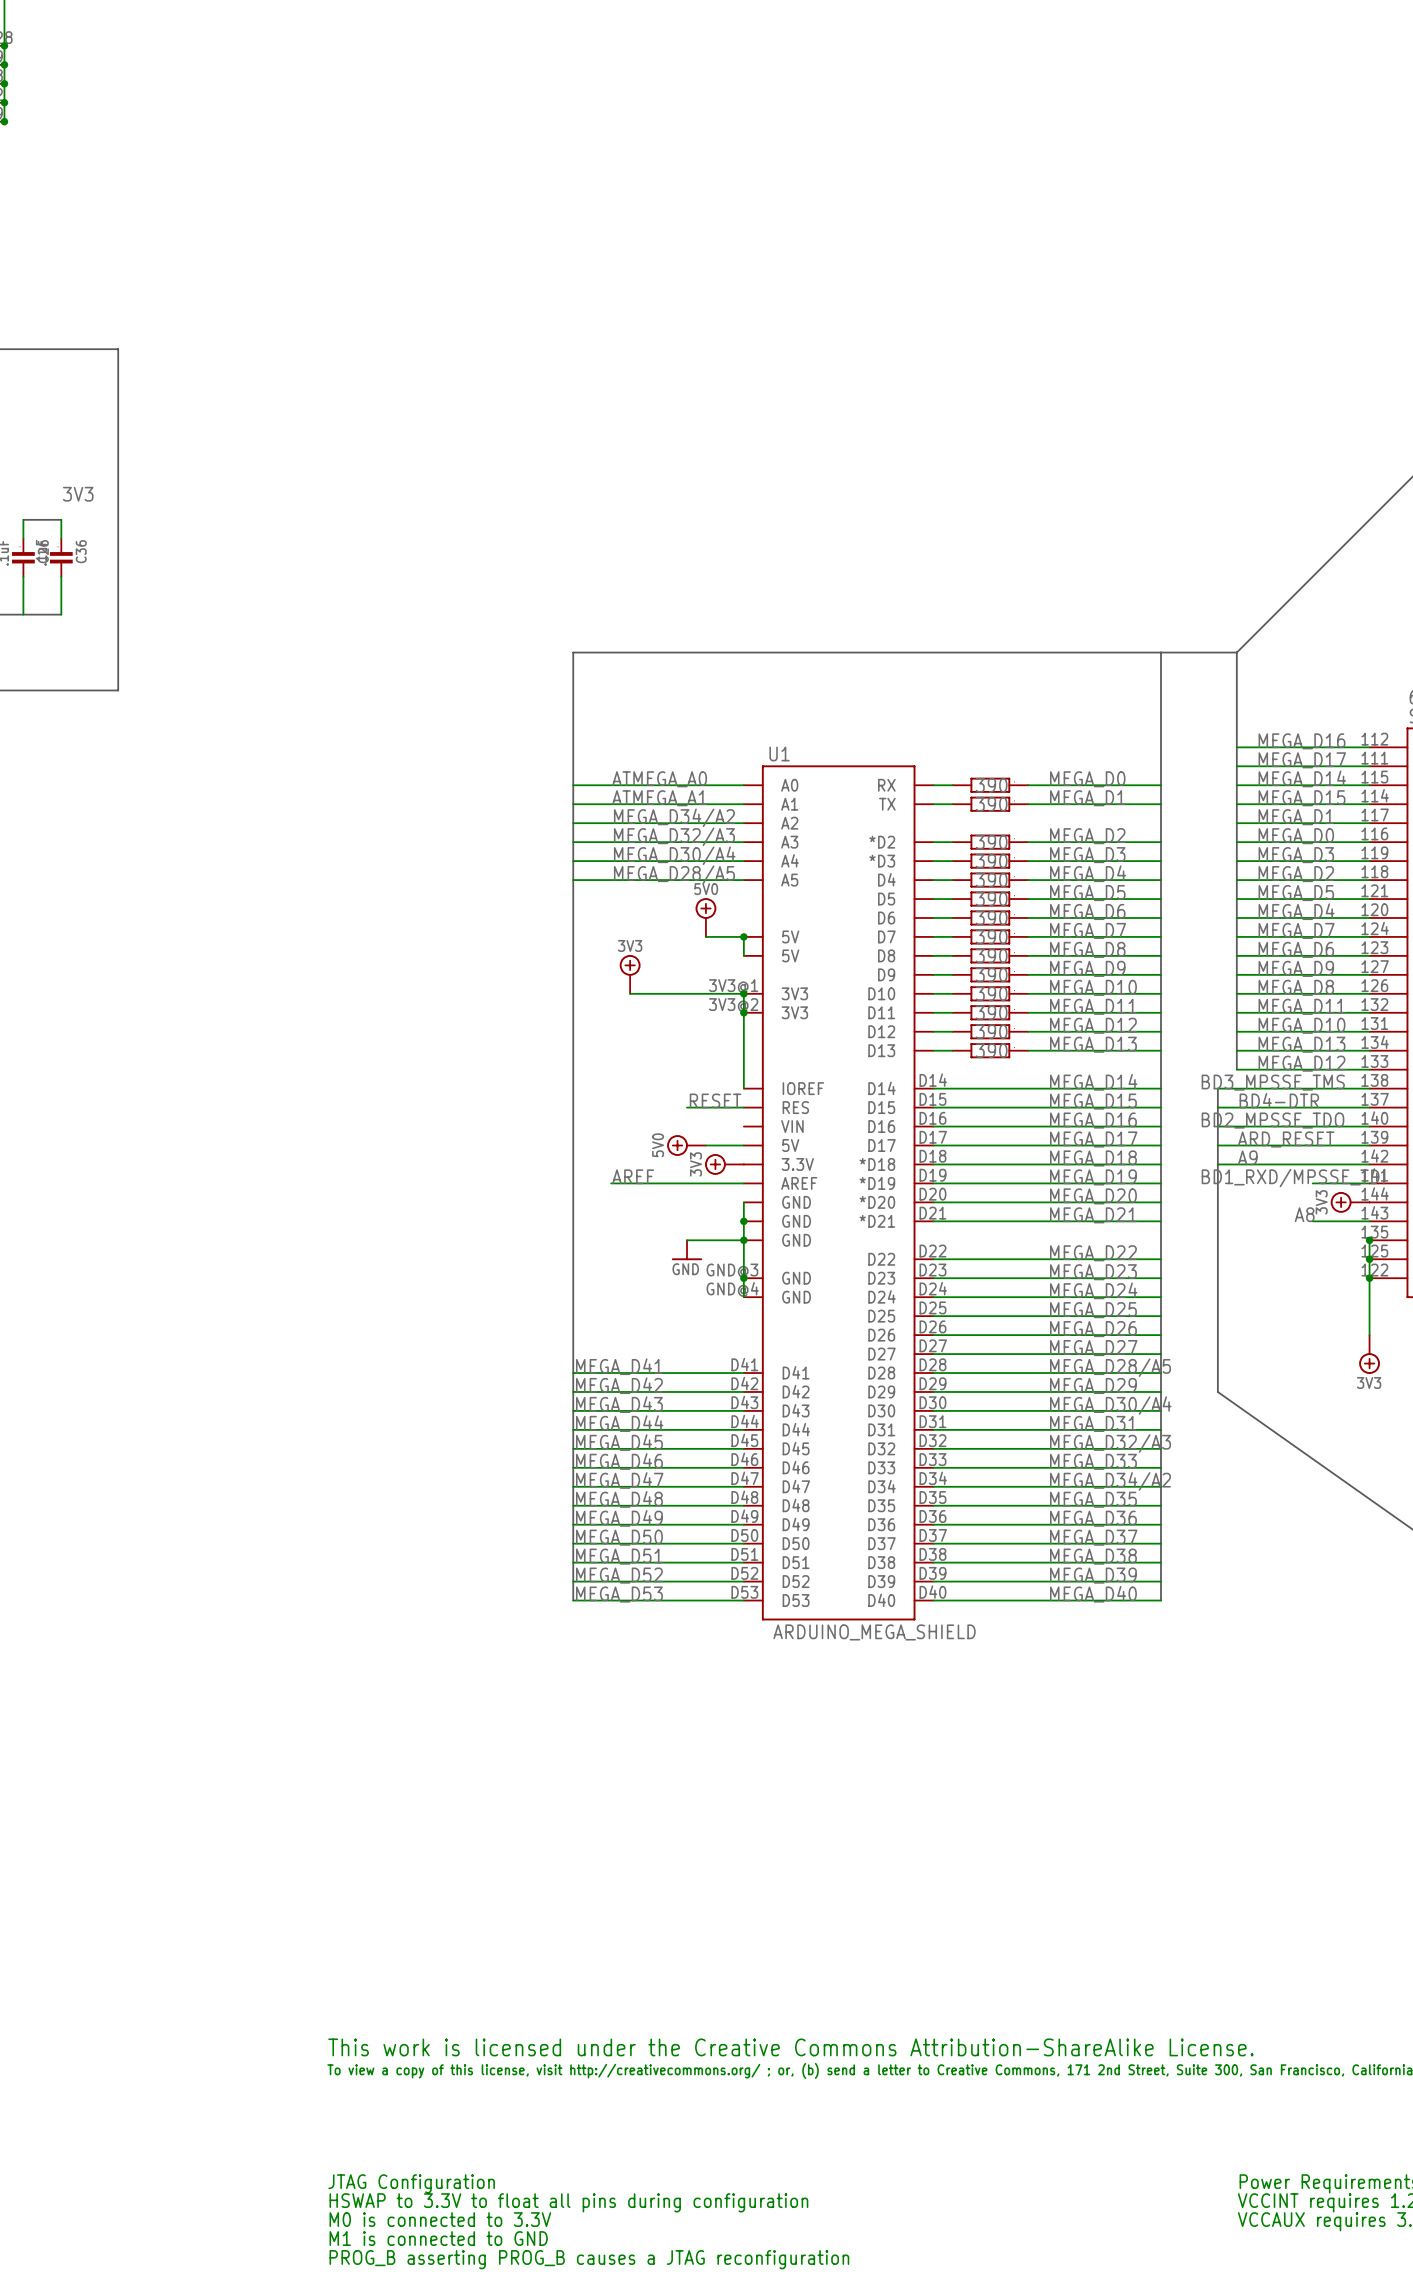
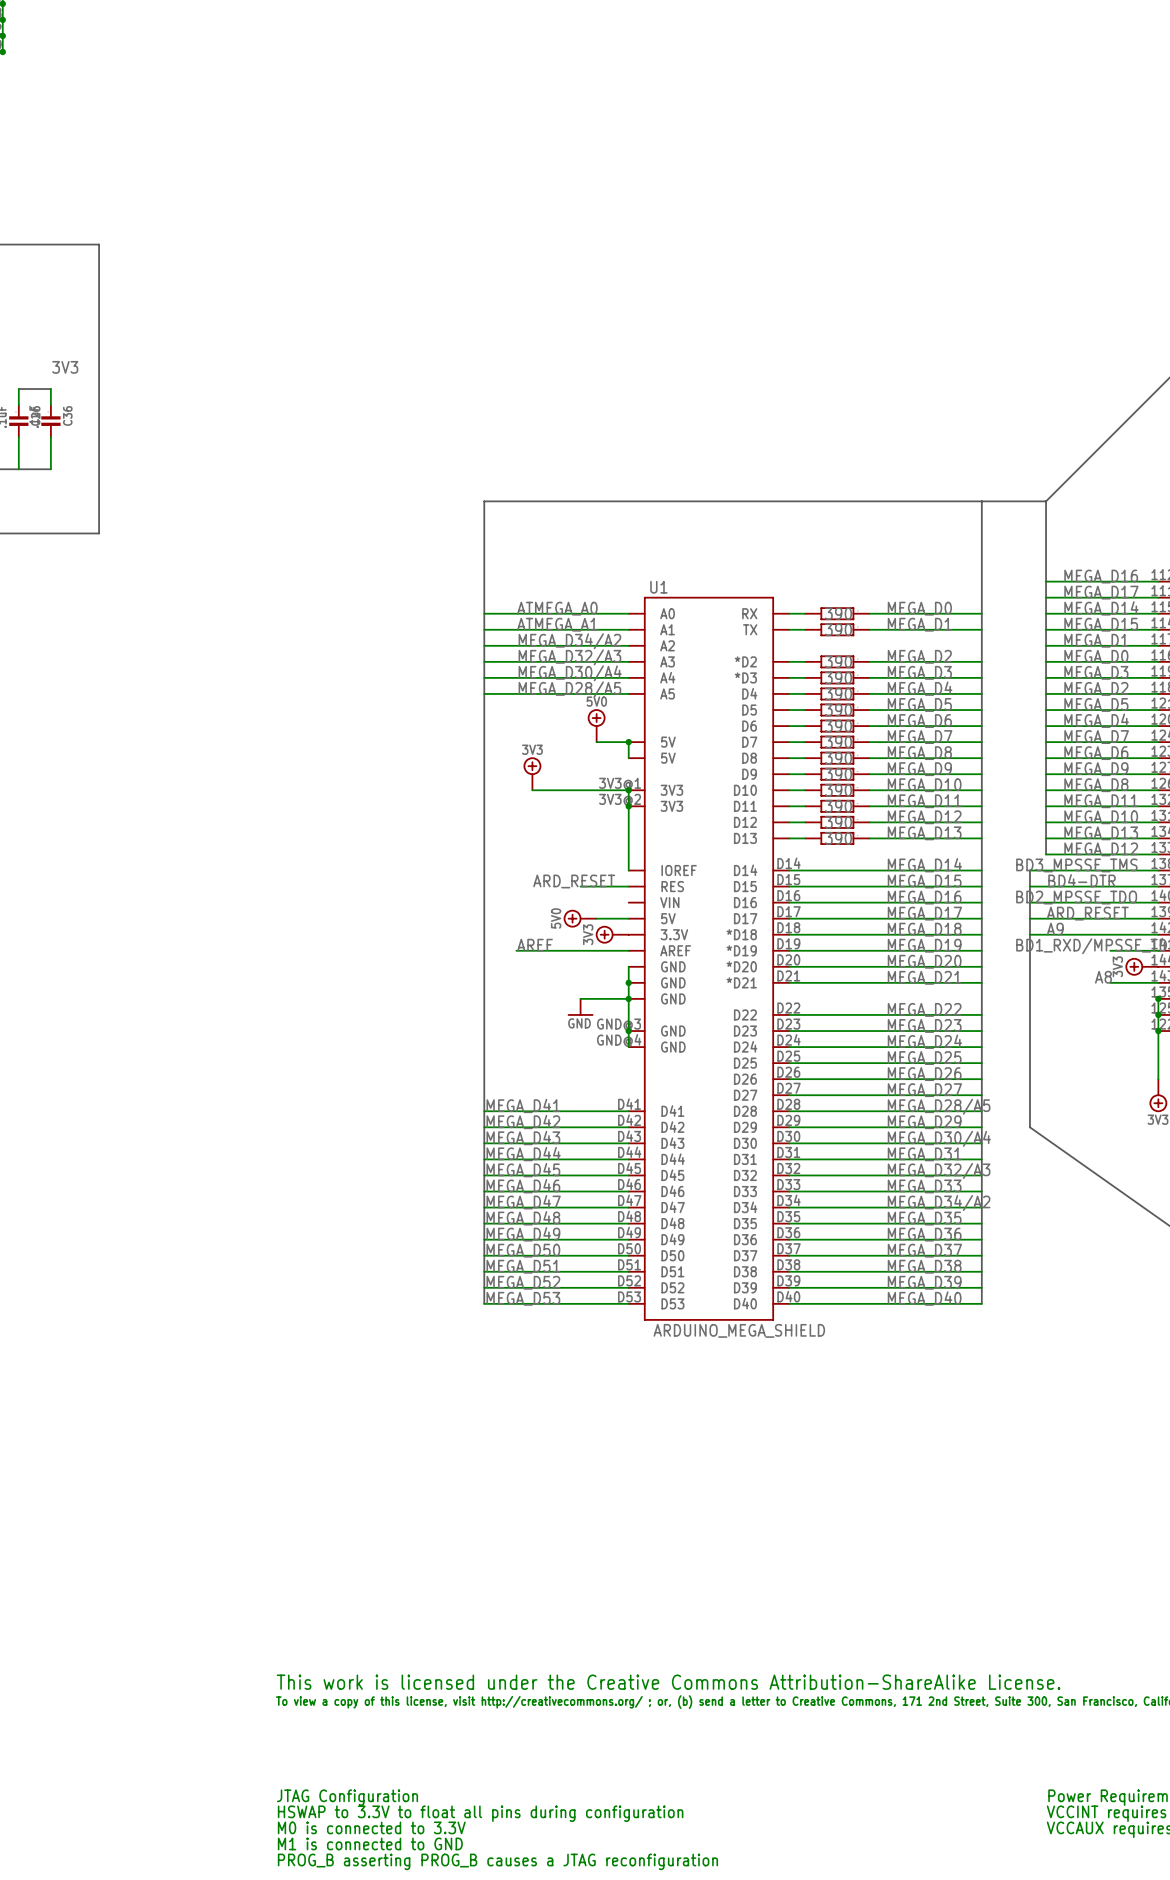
label: RESET (715, 1100) -> ARD_RESET (574, 881)

